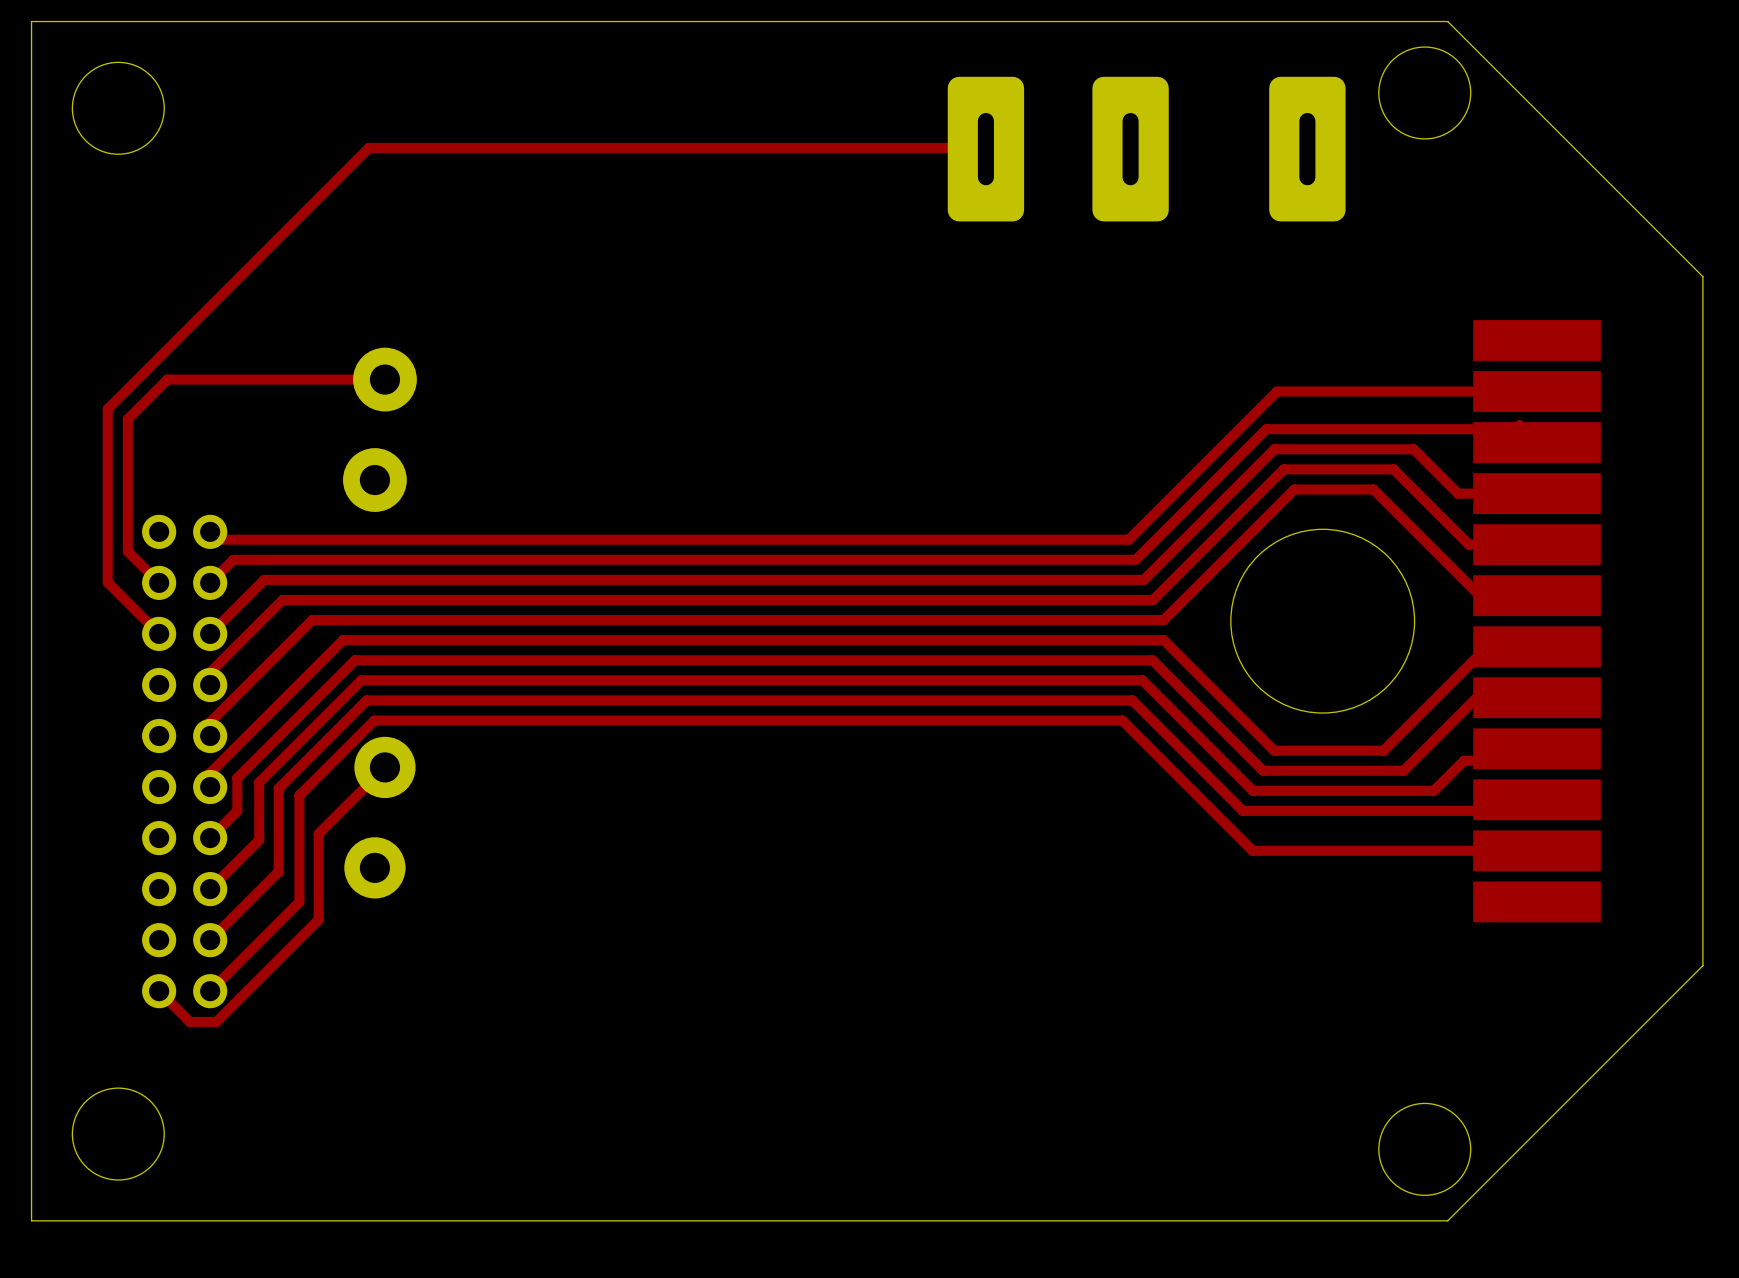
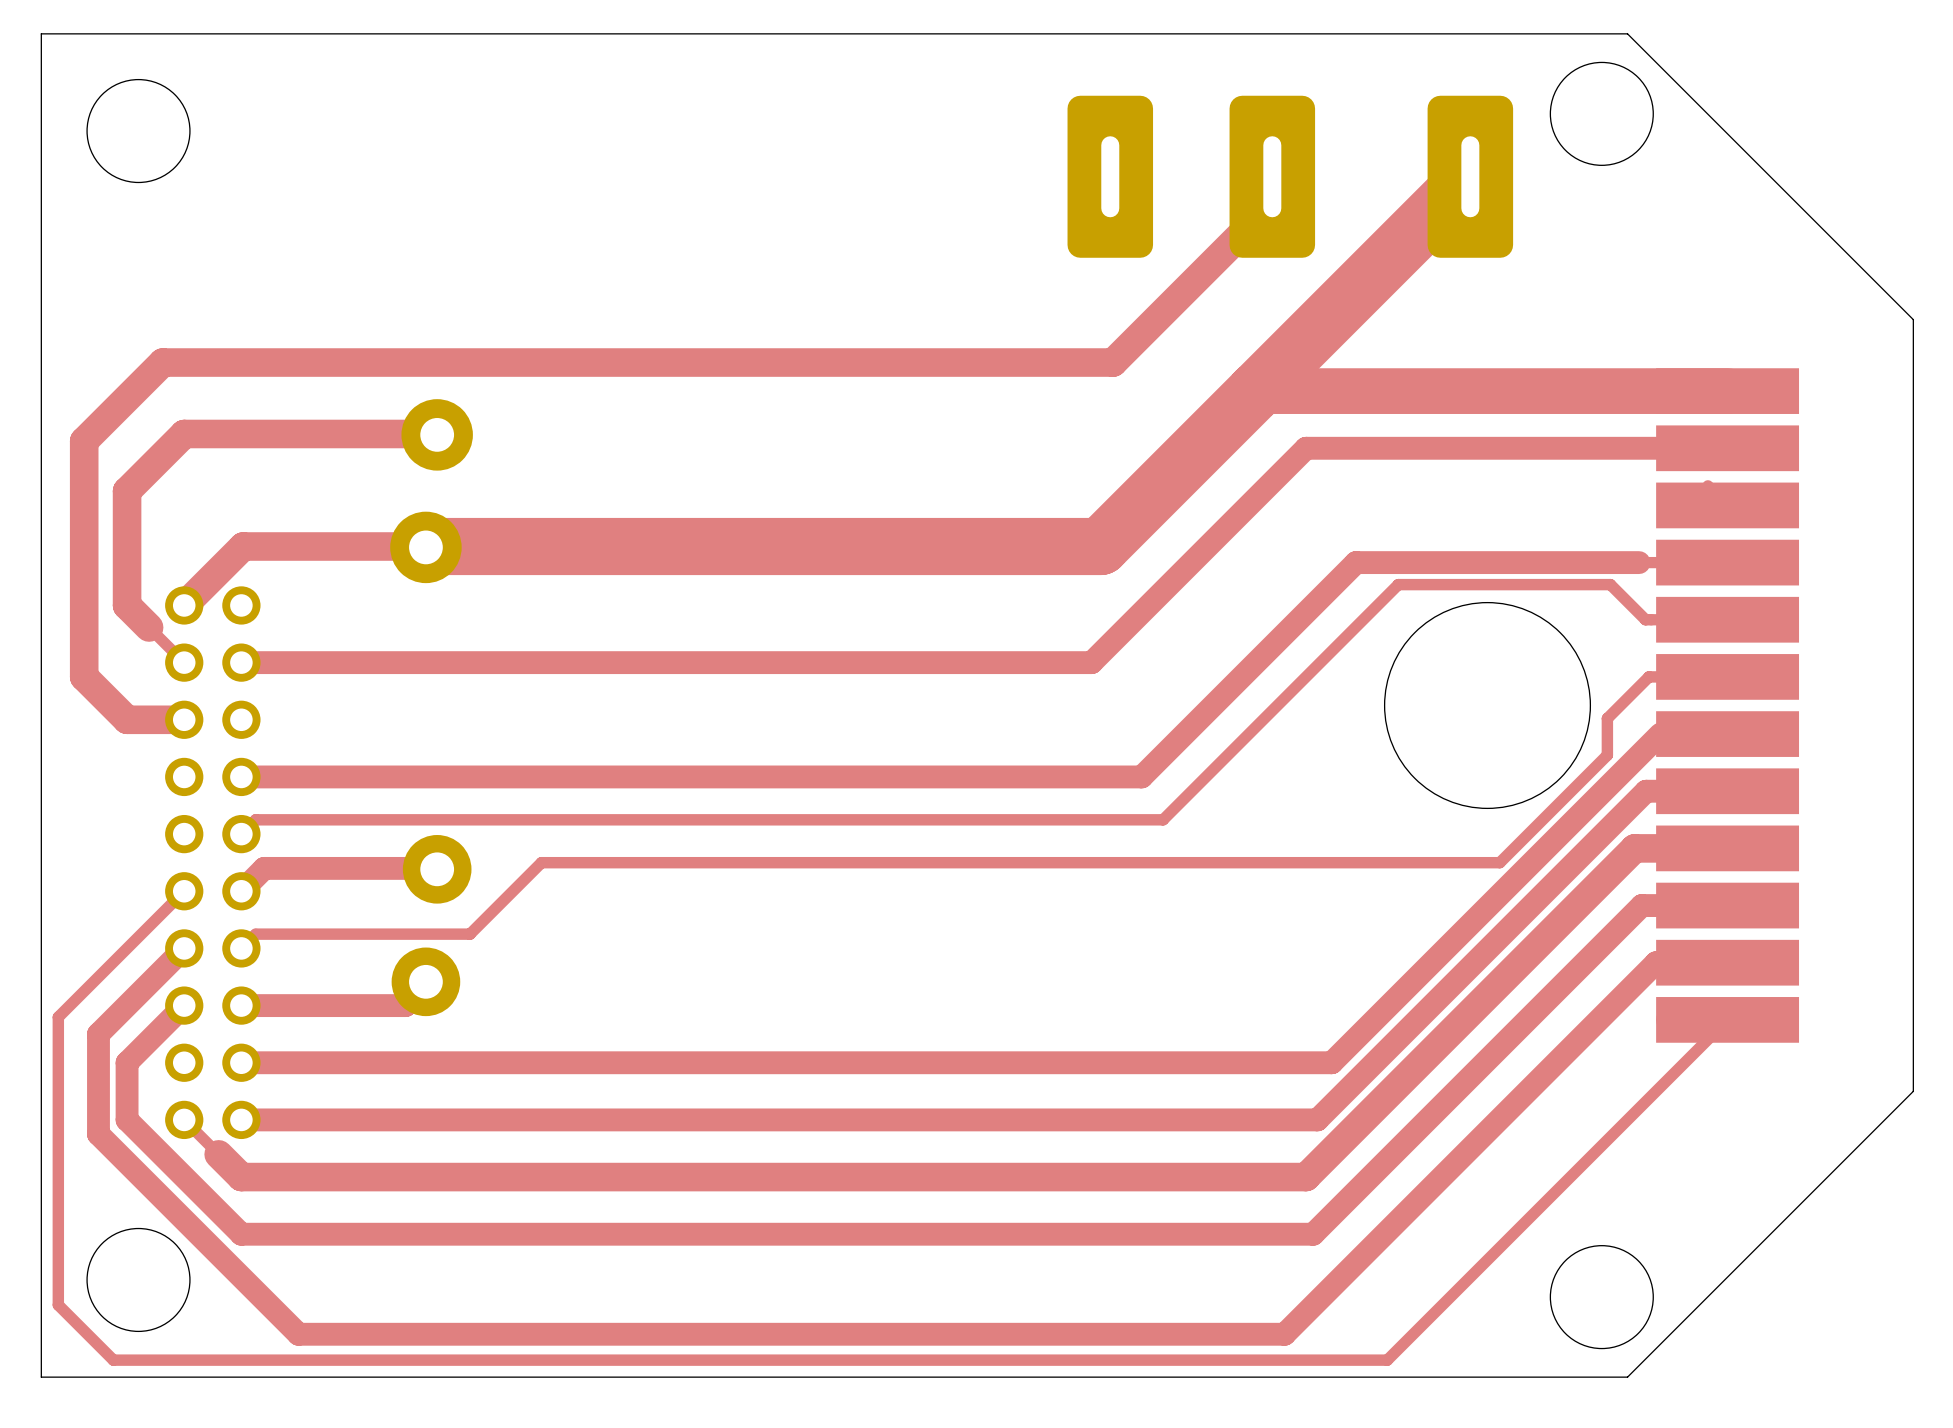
top track: (985, 149) (368, 147) (107, 409) (107, 582) (159, 633) -> (1272, 176) (1272, 203) (1113, 362) (162, 362) (84, 441) (84, 676) (127, 719) (184, 719)
top track: none -> (1470, 176) (1100, 546) (243, 546) (184, 605)
top track: none -> (1255, 391) (1727, 391)
top track: (384, 379) (167, 379) (127, 419) (127, 551) -> (441, 433) (184, 433) (127, 491) (127, 605) (149, 627)
top track: (1276, 391) (1128, 539) (218, 539) (210, 531) -> (1436, 448) (1306, 448) (1091, 662) (241, 662)
top track width: thin (1276, 391) (1537, 391) -> thick (1436, 448) (1727, 448)
top track: (1523, 429) (1266, 429) (1135, 559) (233, 559) (210, 582) -> none
top track: (1457, 493) (1413, 449) (1274, 449) (1143, 579) (264, 579) (210, 633) -> (1639, 562) (1356, 562) (1141, 776) (241, 776)
top track: (1468, 544) (1393, 469) (1283, 469) (1153, 599) (282, 599) (210, 672) (210, 684) -> (1651, 619) (1645, 619) (1610, 584) (1398, 584) (1163, 819) (255, 819) (241, 834)
top track: (1479, 595) (1373, 489) (1294, 489) (1163, 620) (312, 620) (210, 722) (210, 736) -> (1663, 676) (1648, 676) (1607, 718) (1607, 755) (1499, 862) (541, 862) (470, 934) (255, 934)
top track: (1487, 646) (1383, 750) (1274, 750) (1163, 640) (342, 640) (210, 772) (210, 787) -> (1672, 734) (1660, 734) (1331, 1062) (241, 1062)
top track: (1476, 697) (1403, 770) (1262, 770) (1152, 660) (355, 660) (237, 777) (237, 810) (222, 825) -> none
top track: (1537, 748) (1525, 760) (1463, 760) (1433, 790) (1252, 790) (1142, 680) (361, 680) (259, 782) (259, 840) (210, 889) -> (1727, 848) (1634, 848) (1306, 1177) (241, 1177) (218, 1154)
top track: none -> (441, 868) (264, 868) (241, 891)
top track: (384, 767) (318, 833) (318, 919) (216, 1021) (189, 1021) -> none
top track: none -> (184, 891) (58, 1017) (58, 1305) (113, 1360) (1387, 1360) (1727, 1019) (1670, 1019)
top track: (1537, 799) (1525, 810) (1242, 810) (1132, 700) (366, 700) (278, 788) (278, 871) (210, 940) -> (1727, 905) (1641, 905) (1313, 1234) (241, 1234) (127, 1119) (127, 1062) (184, 1005)
top track: none -> (184, 948) (98, 1034) (98, 1134) (298, 1334) (1284, 1334) (1656, 962)
top track: (1473, 850) (1252, 850) (1122, 720) (374, 720) (299, 795) (299, 901) (210, 991) -> (1659, 791) (1646, 791) (1317, 1119) (241, 1119)
top track: none -> (430, 980) (405, 1005) (241, 1005)

